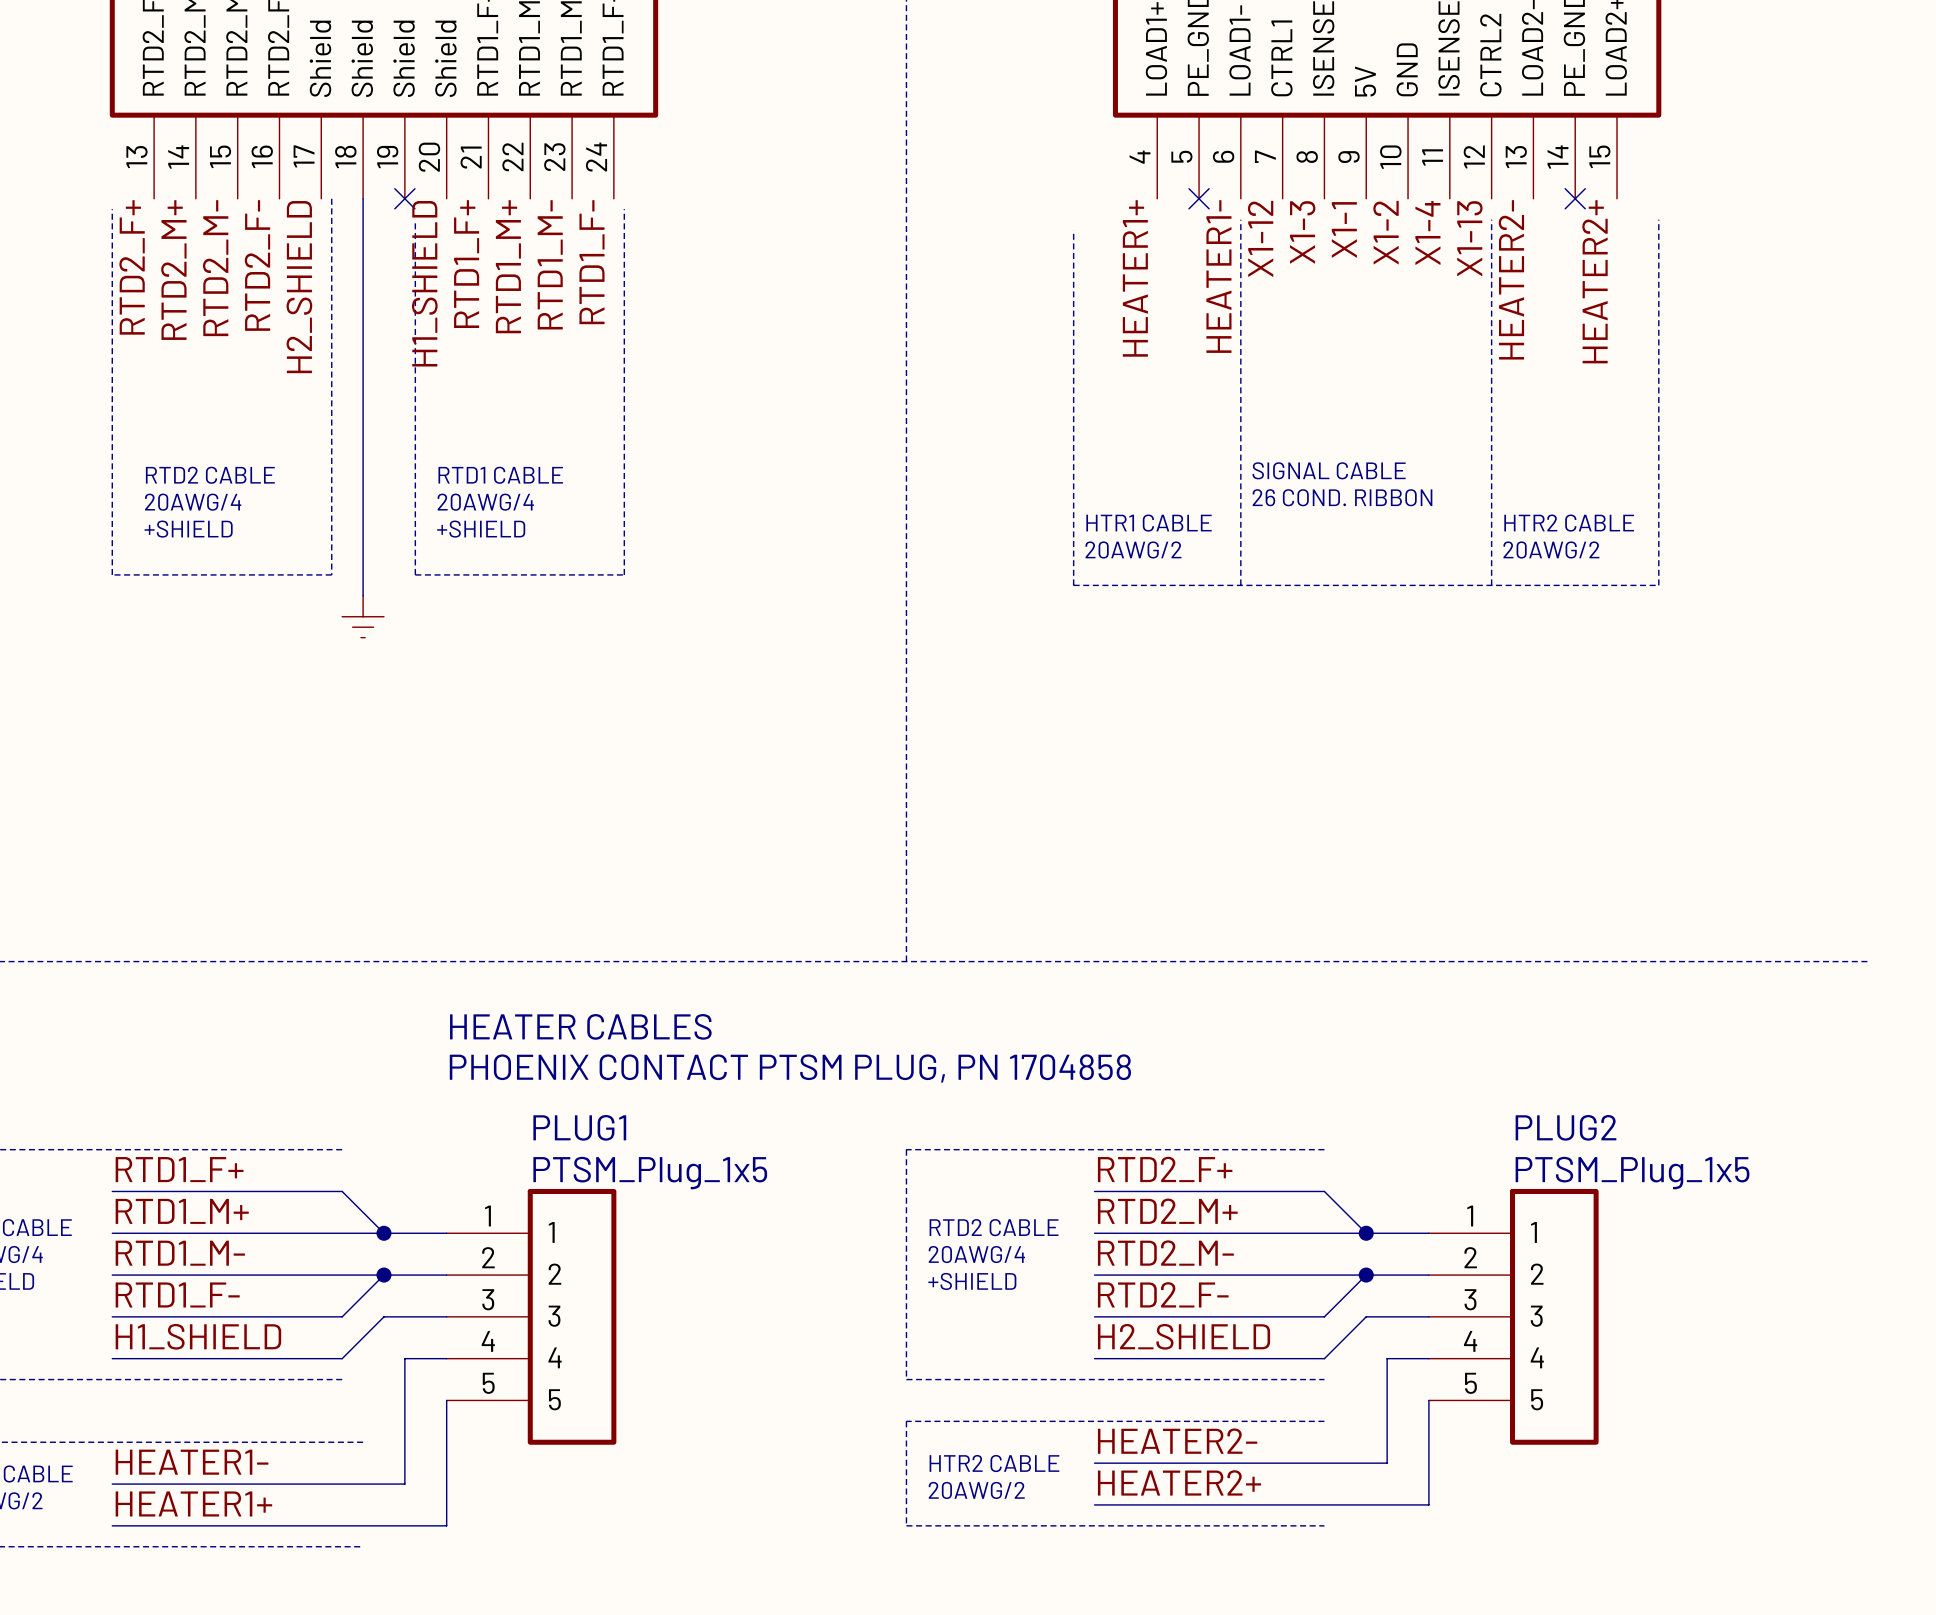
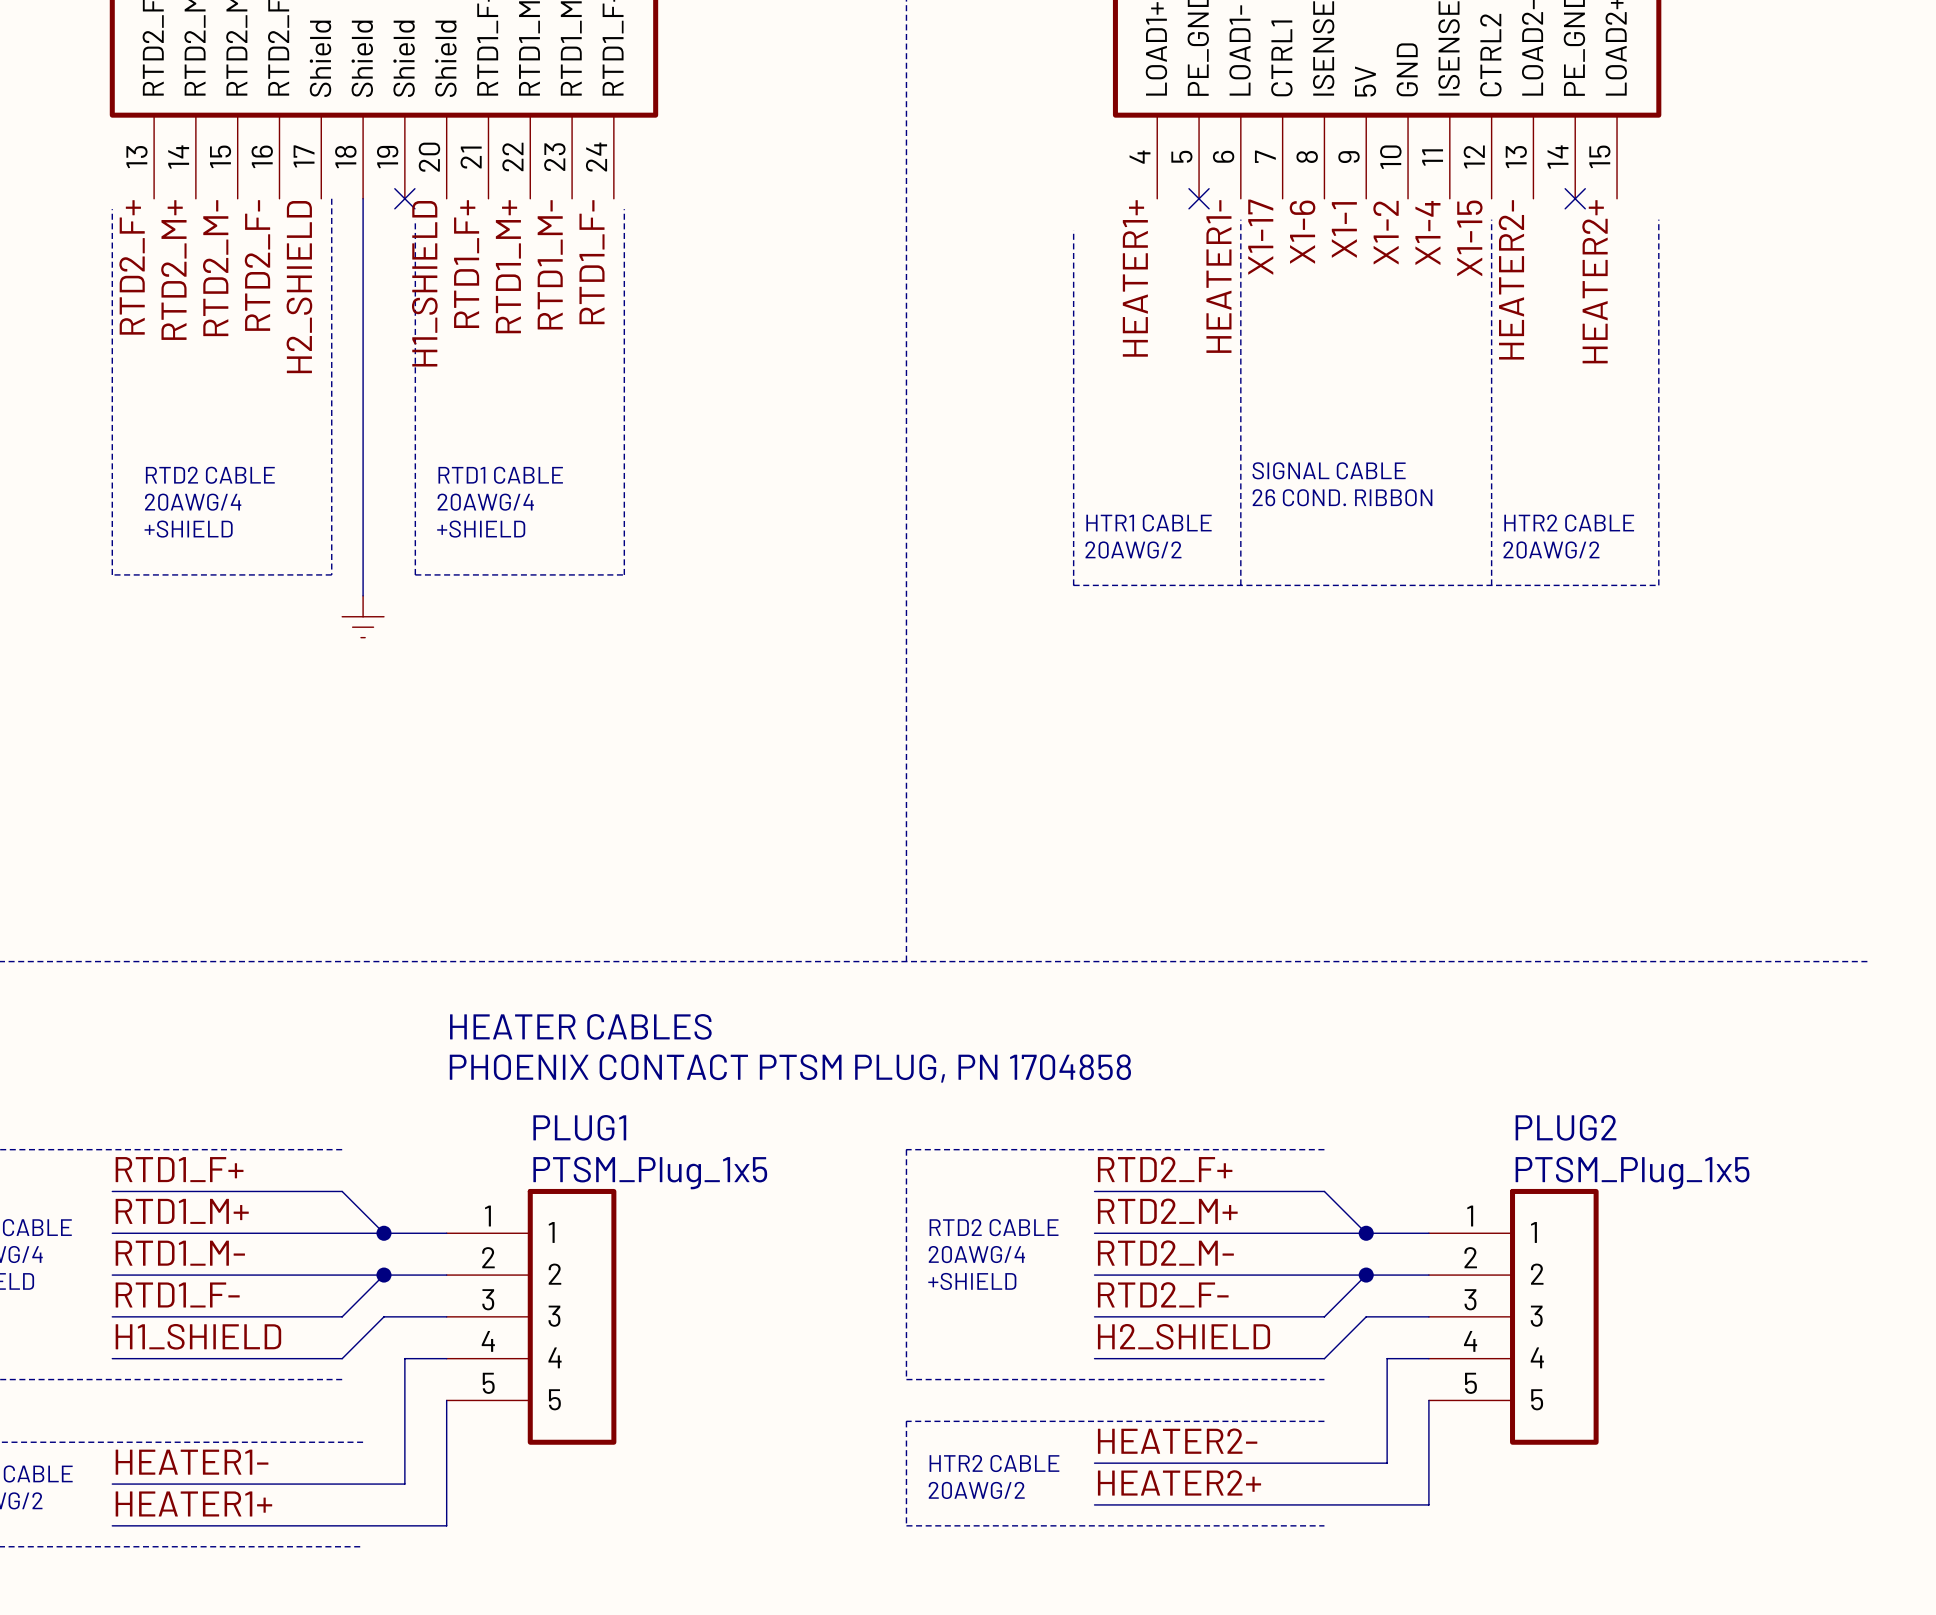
label: X1-3 (1302, 232) -> X1-6 (1302, 232)
label: X1-12 (1260, 238) -> X1-17 (1260, 237)
label: X1-13 (1469, 238) -> X1-15 (1469, 238)

